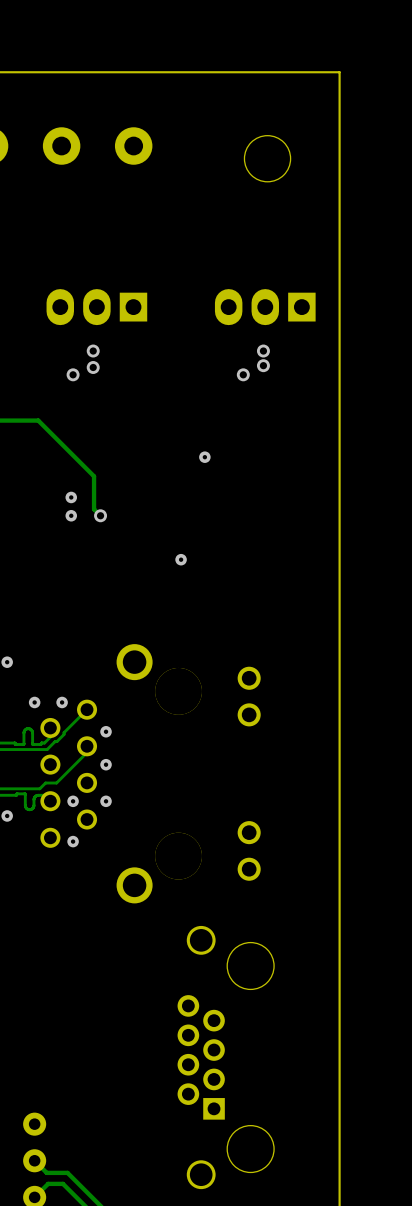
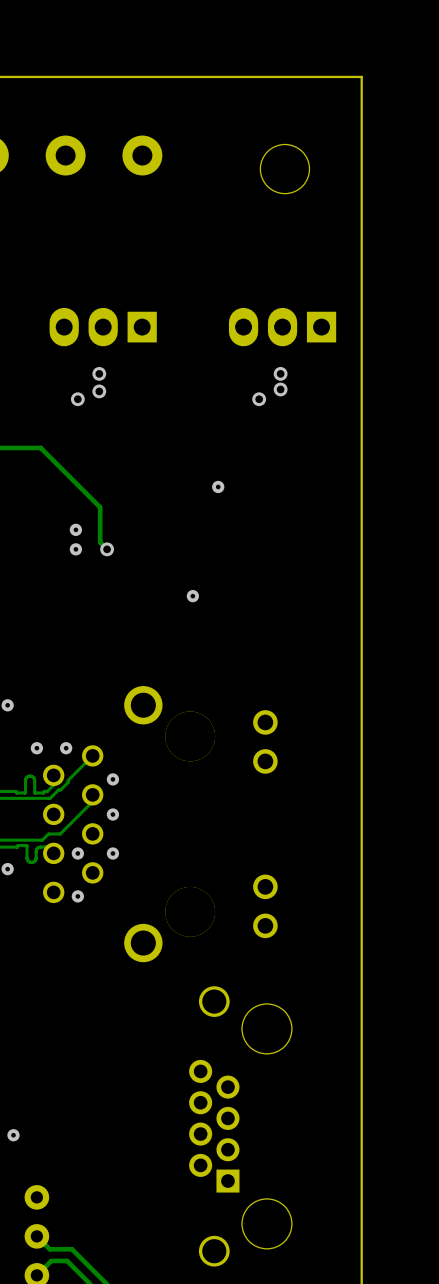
via: none -> (13, 1135)

